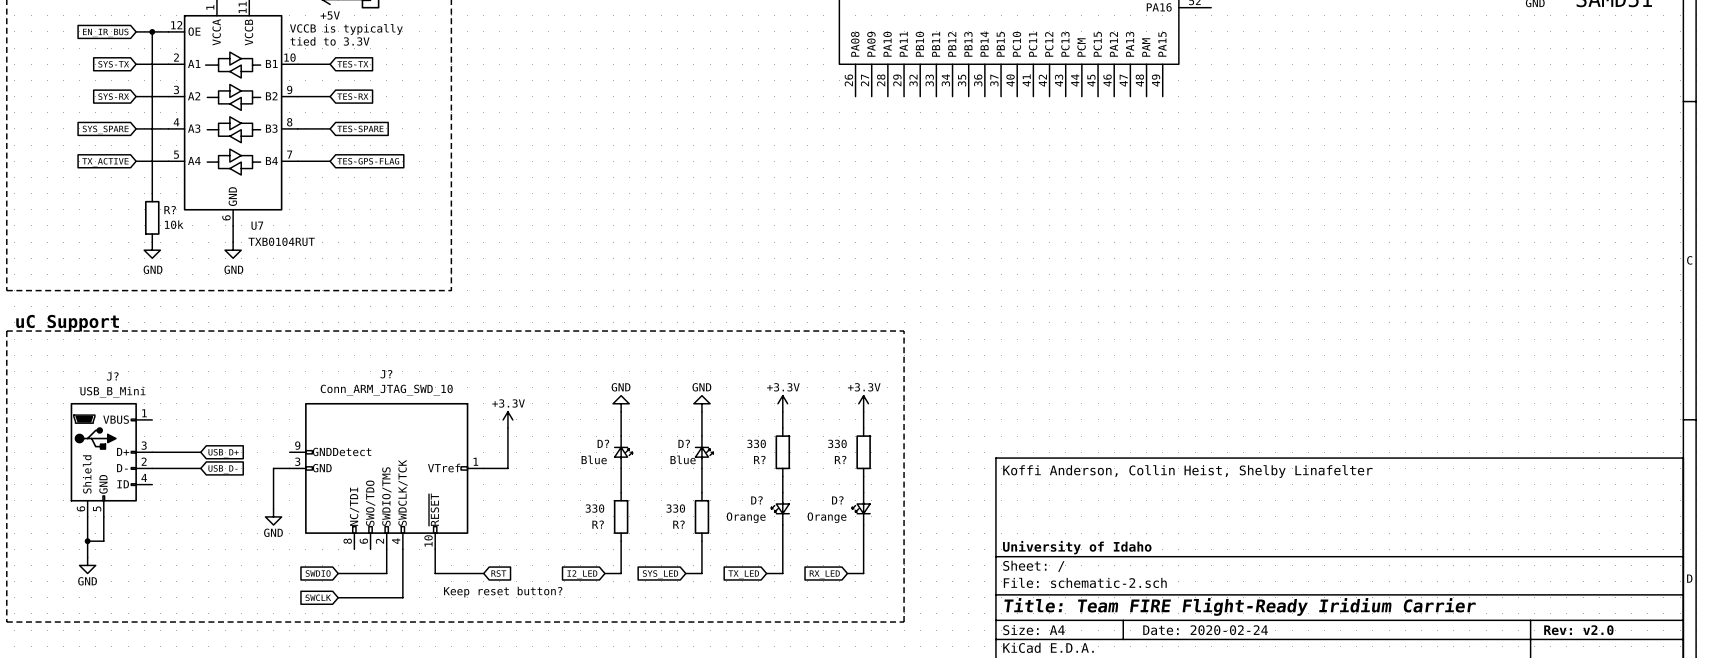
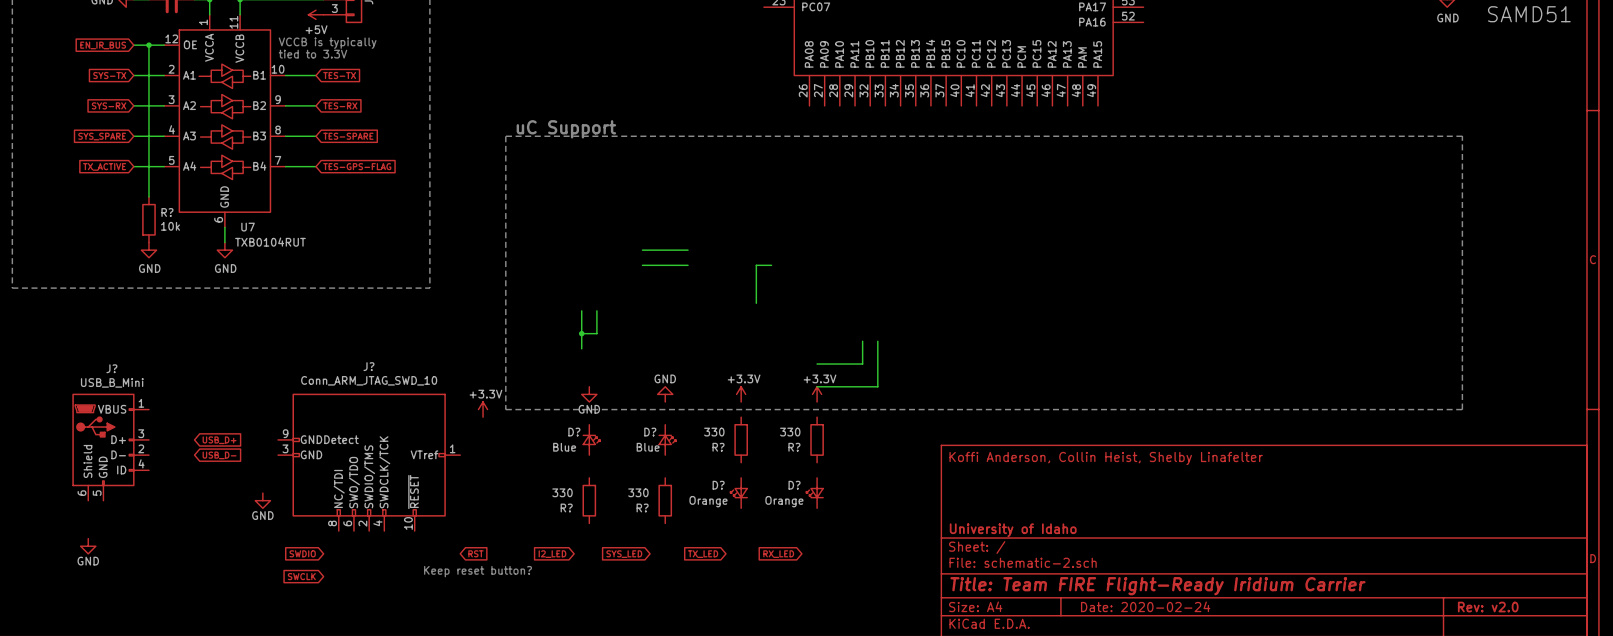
text: none -> uC Support (566, 129)
line: none -> (505, 136) (1462, 136) (1462, 409) (505, 409) (505, 136)
wire: none -> (642, 250) (688, 250)
wire: none -> (642, 265) (688, 265)
wire: none -> (771, 265) (756, 265) (756, 303)
wire: none -> (581, 310) (581, 348)
wire: none -> (596, 310) (596, 333) (581, 333)
text: uC Support (67, 323) -> none
line: (6, 331) (6, 622) (904, 622) (904, 331) (6, 331) -> none
junction: none -> (581, 333)
wire: none -> (862, 341) (862, 364) (817, 364)
wire: none -> (877, 341) (877, 386) (817, 386)
power symbol rotation: 0° (621, 403) -> 180° (589, 394)
wire: (621, 411) (621, 436) -> none
wire: (701, 411) (701, 436) -> none
wire: (782, 411) (782, 428) -> none
wire: (863, 411) (863, 428) -> none
wire: (507, 428) (507, 468) (483, 468) -> none
wire: (152, 452) (200, 452) -> none
wire: (152, 468) (200, 468) -> none
wire: (289, 468) (273, 468) (273, 508) -> none
wire: (621, 468) (621, 492) -> none
wire: (701, 468) (701, 492) -> none
wire: (782, 476) (782, 492) -> none
wire: (863, 476) (863, 492) -> none
wire: (87, 516) (87, 557) -> none
wire: (103, 516) (103, 541) (87, 541) -> none
wire: (782, 525) (782, 573) (766, 573) -> none
wire: (863, 525) (863, 573) (847, 573) -> none
junction: (87, 541) -> none
wire: (621, 541) (621, 573) (604, 573) -> none
wire: (701, 541) (701, 573) (685, 573) -> none
wire: (386, 549) (386, 573) (338, 573) -> none
wire: (402, 549) (402, 597) (338, 597) -> none
wire: (435, 549) (435, 573) (483, 573) -> none

